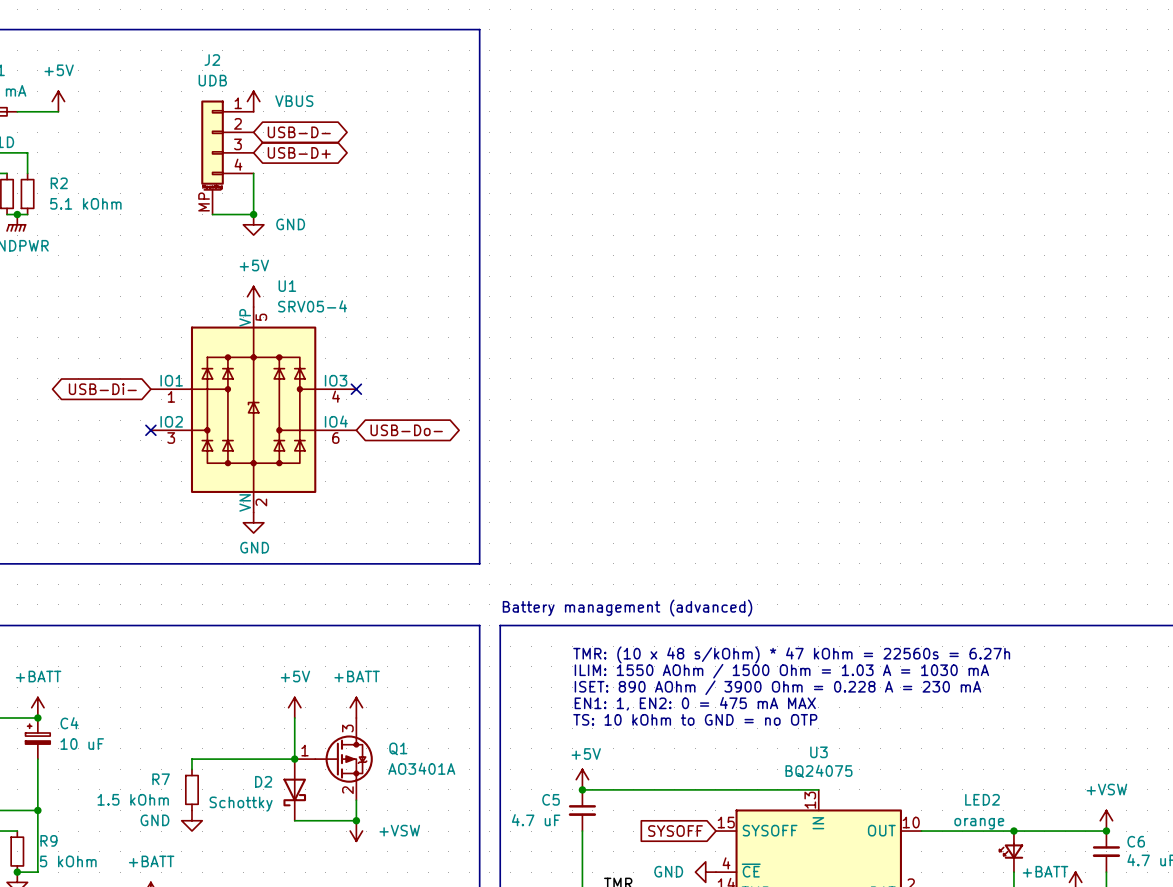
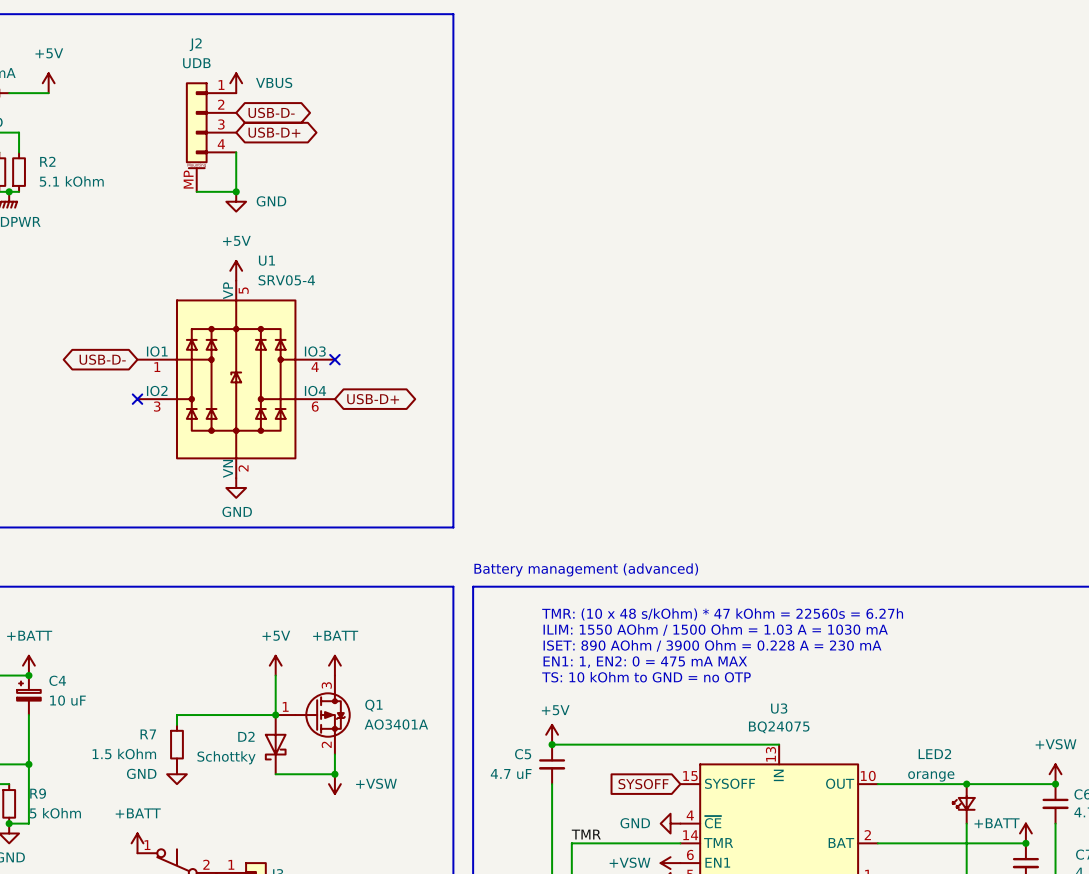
global label: USB-Di- (102, 389) -> USB-D- (102, 359)
global label: USB-Do- (406, 430) -> USB-D+ (373, 399)

